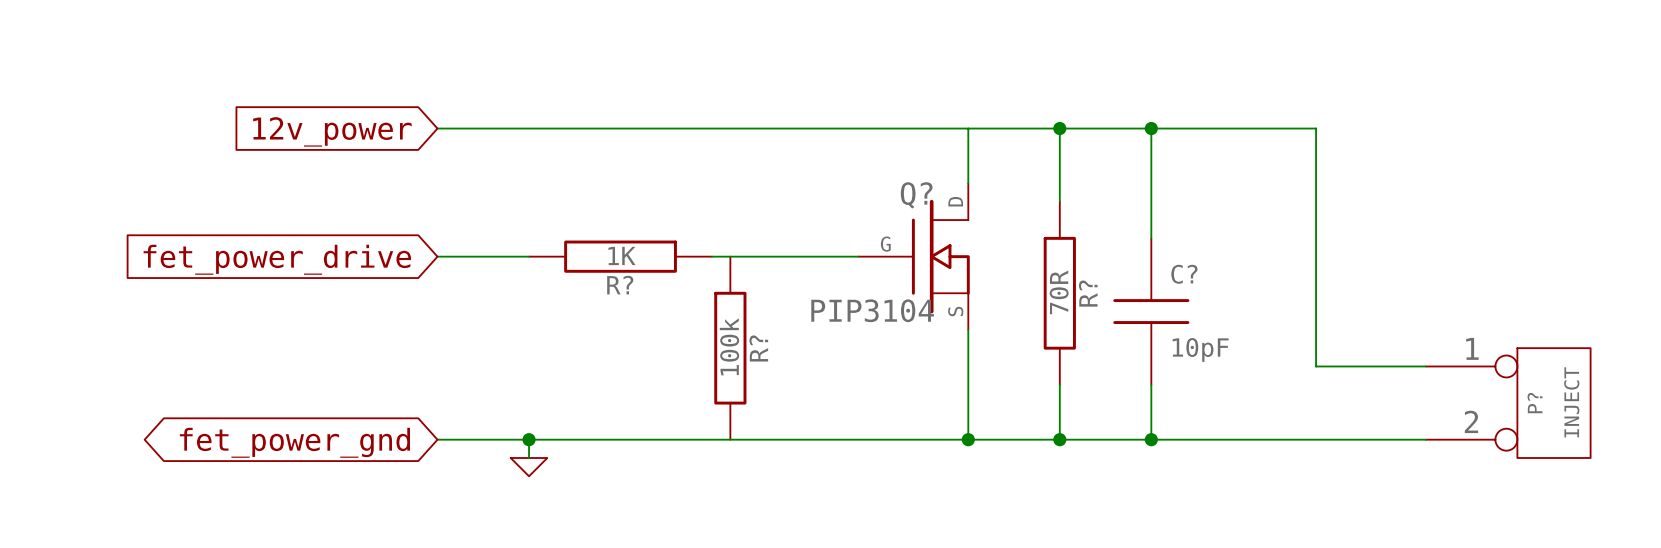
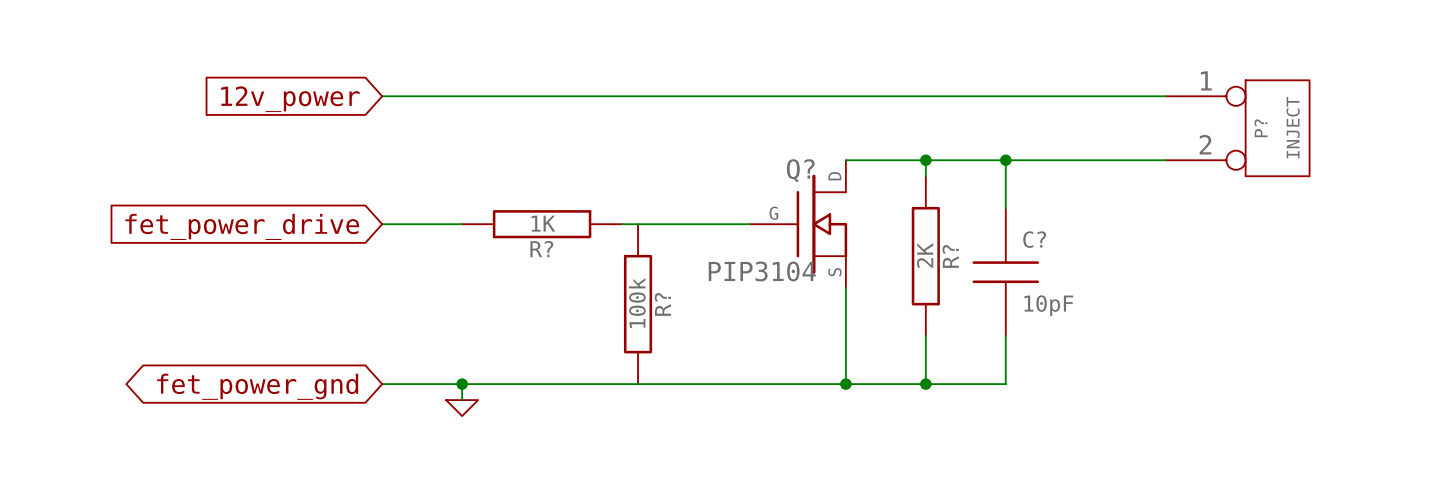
wire: none -> (382, 96) (1165, 96)
wire: (437, 128) (1316, 128) (1316, 366) (1425, 366) -> none
wire: (968, 128) (968, 183) -> (1165, 160) (845, 160)
wire: (1059, 128) (1059, 183) -> none
junction: (1059, 128) -> none
wire: (1151, 128) (1151, 183) -> none
junction: (1151, 128) -> none
global label position: 12v_power (332, 131) -> 12v_power (290, 99)
junction: none -> (925, 160)
junction: none -> (1005, 160)
R? value: 70R (1059, 292) -> 2K (925, 255)
P? position: (1508, 403) -> (1237, 128)
wire: (1151, 439) (1425, 439) -> none
junction: (1151, 439) -> none

